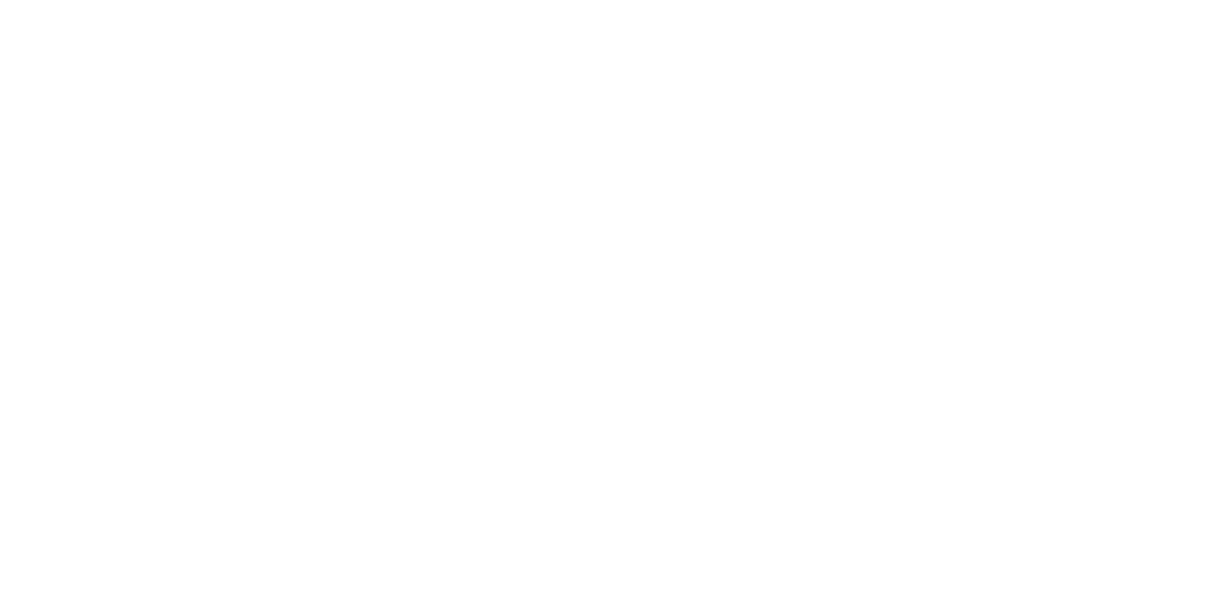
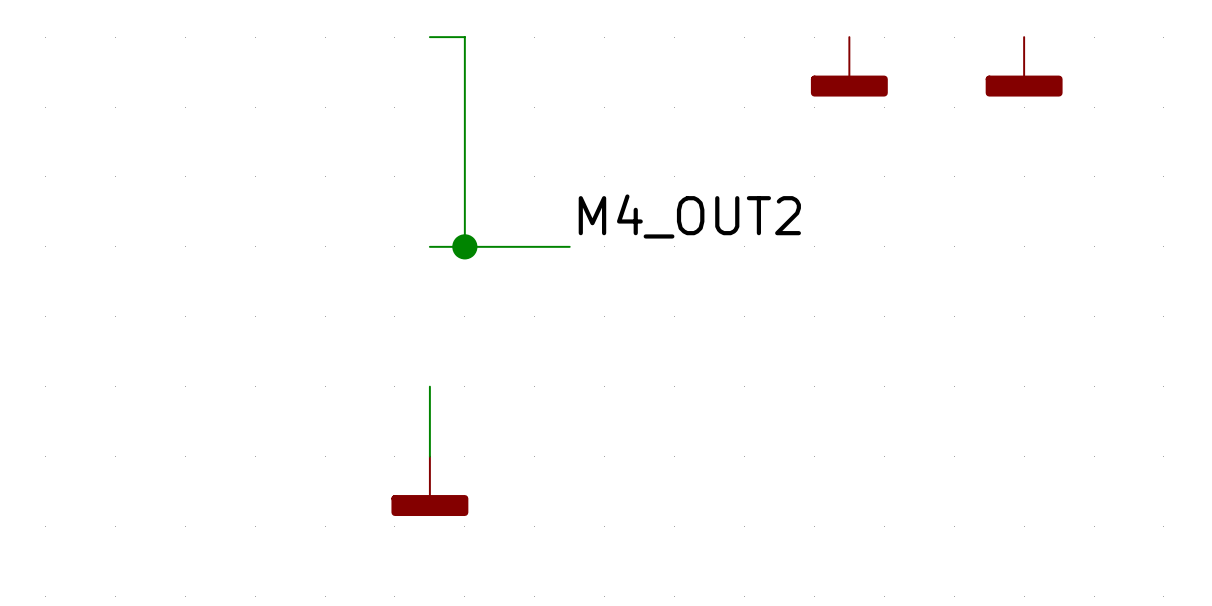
wire: none -> (429, 37) (464, 37) (464, 246)
power symbol: none -> (849, 66)
power symbol: none -> (1024, 66)
label: none -> M4_OUT2 (689, 216)
wire: none -> (429, 246) (569, 246)
junction: none -> (464, 246)
wire: none -> (429, 386) (429, 456)
power symbol: none -> (429, 486)

